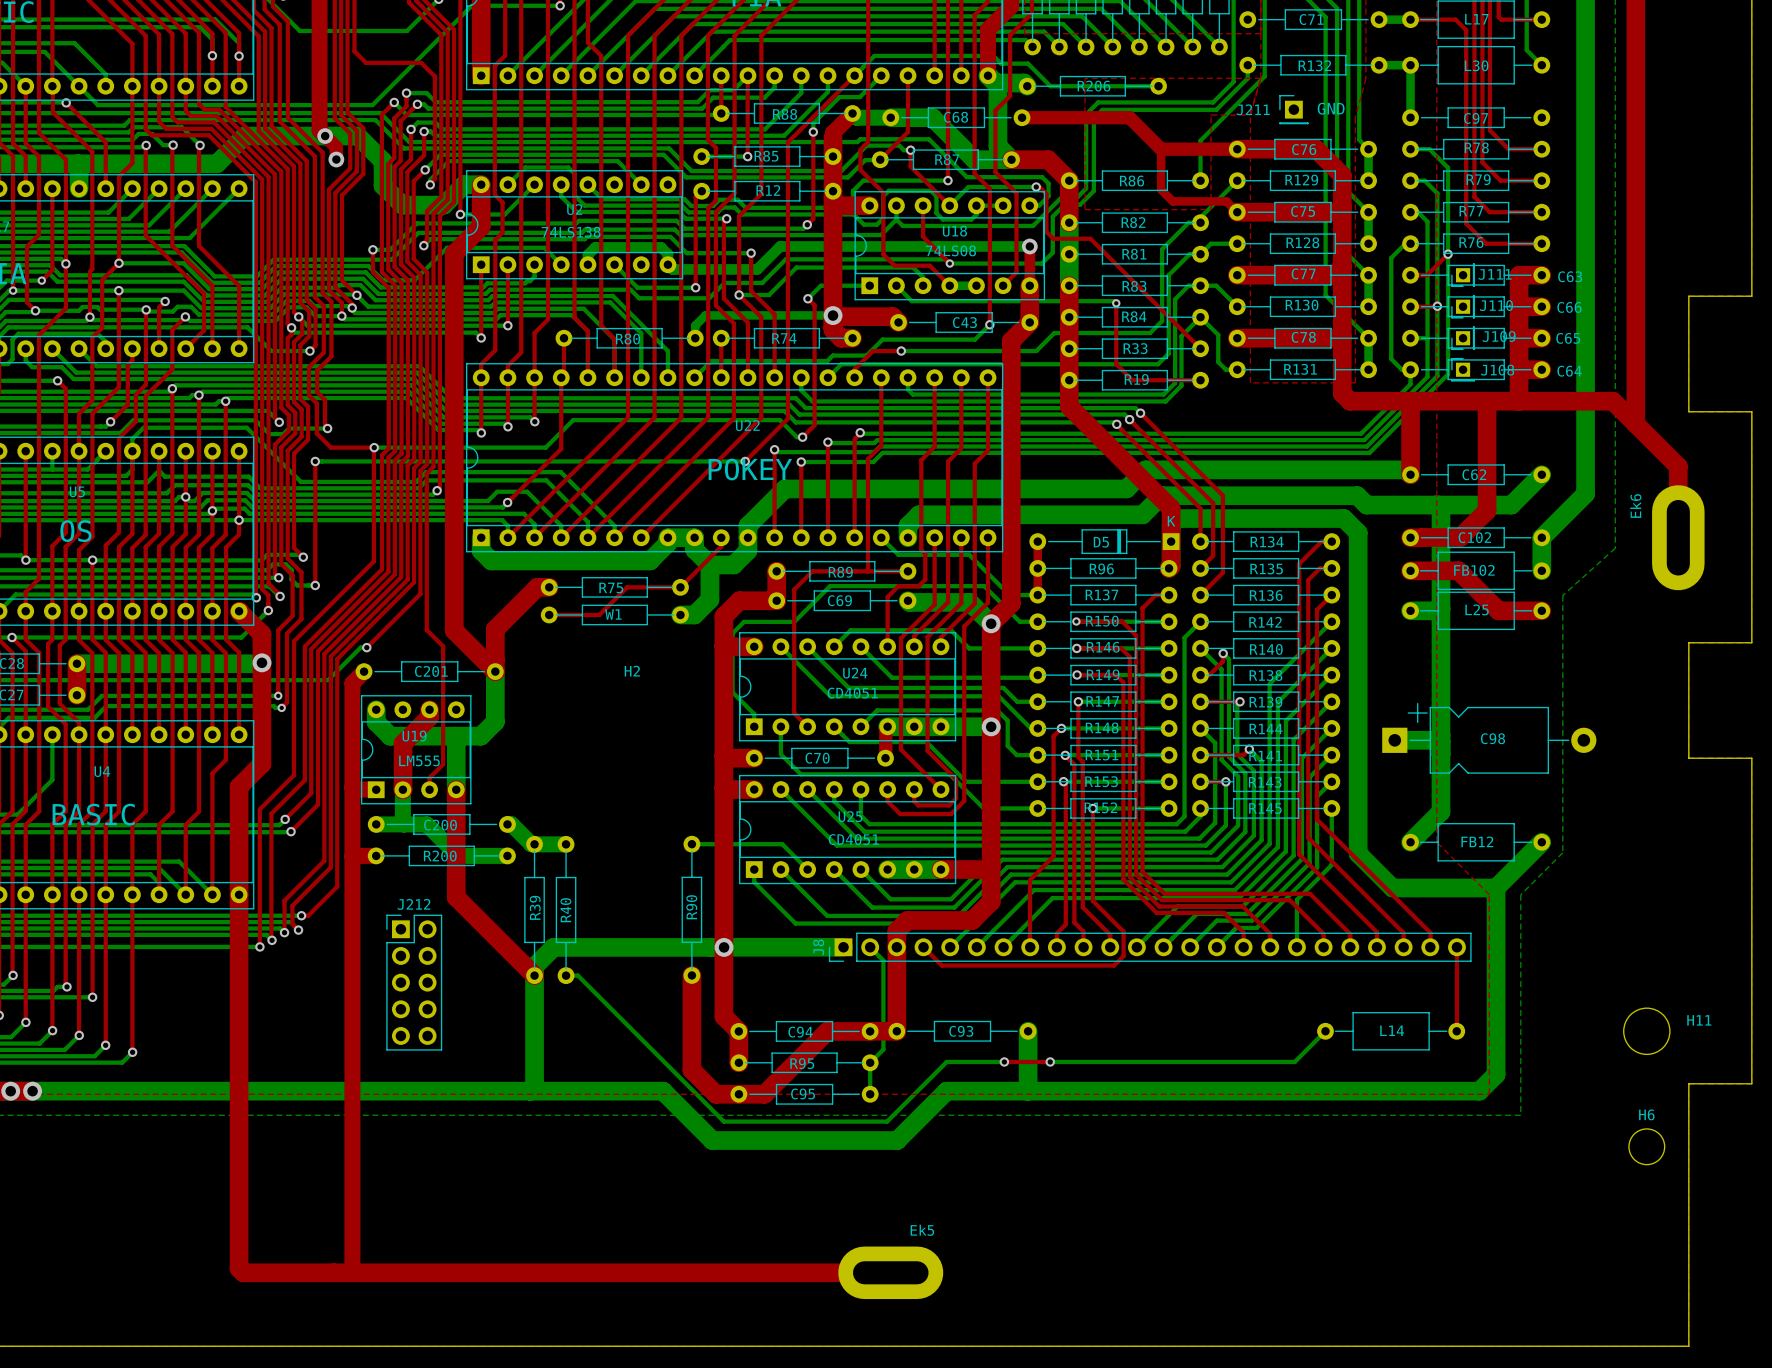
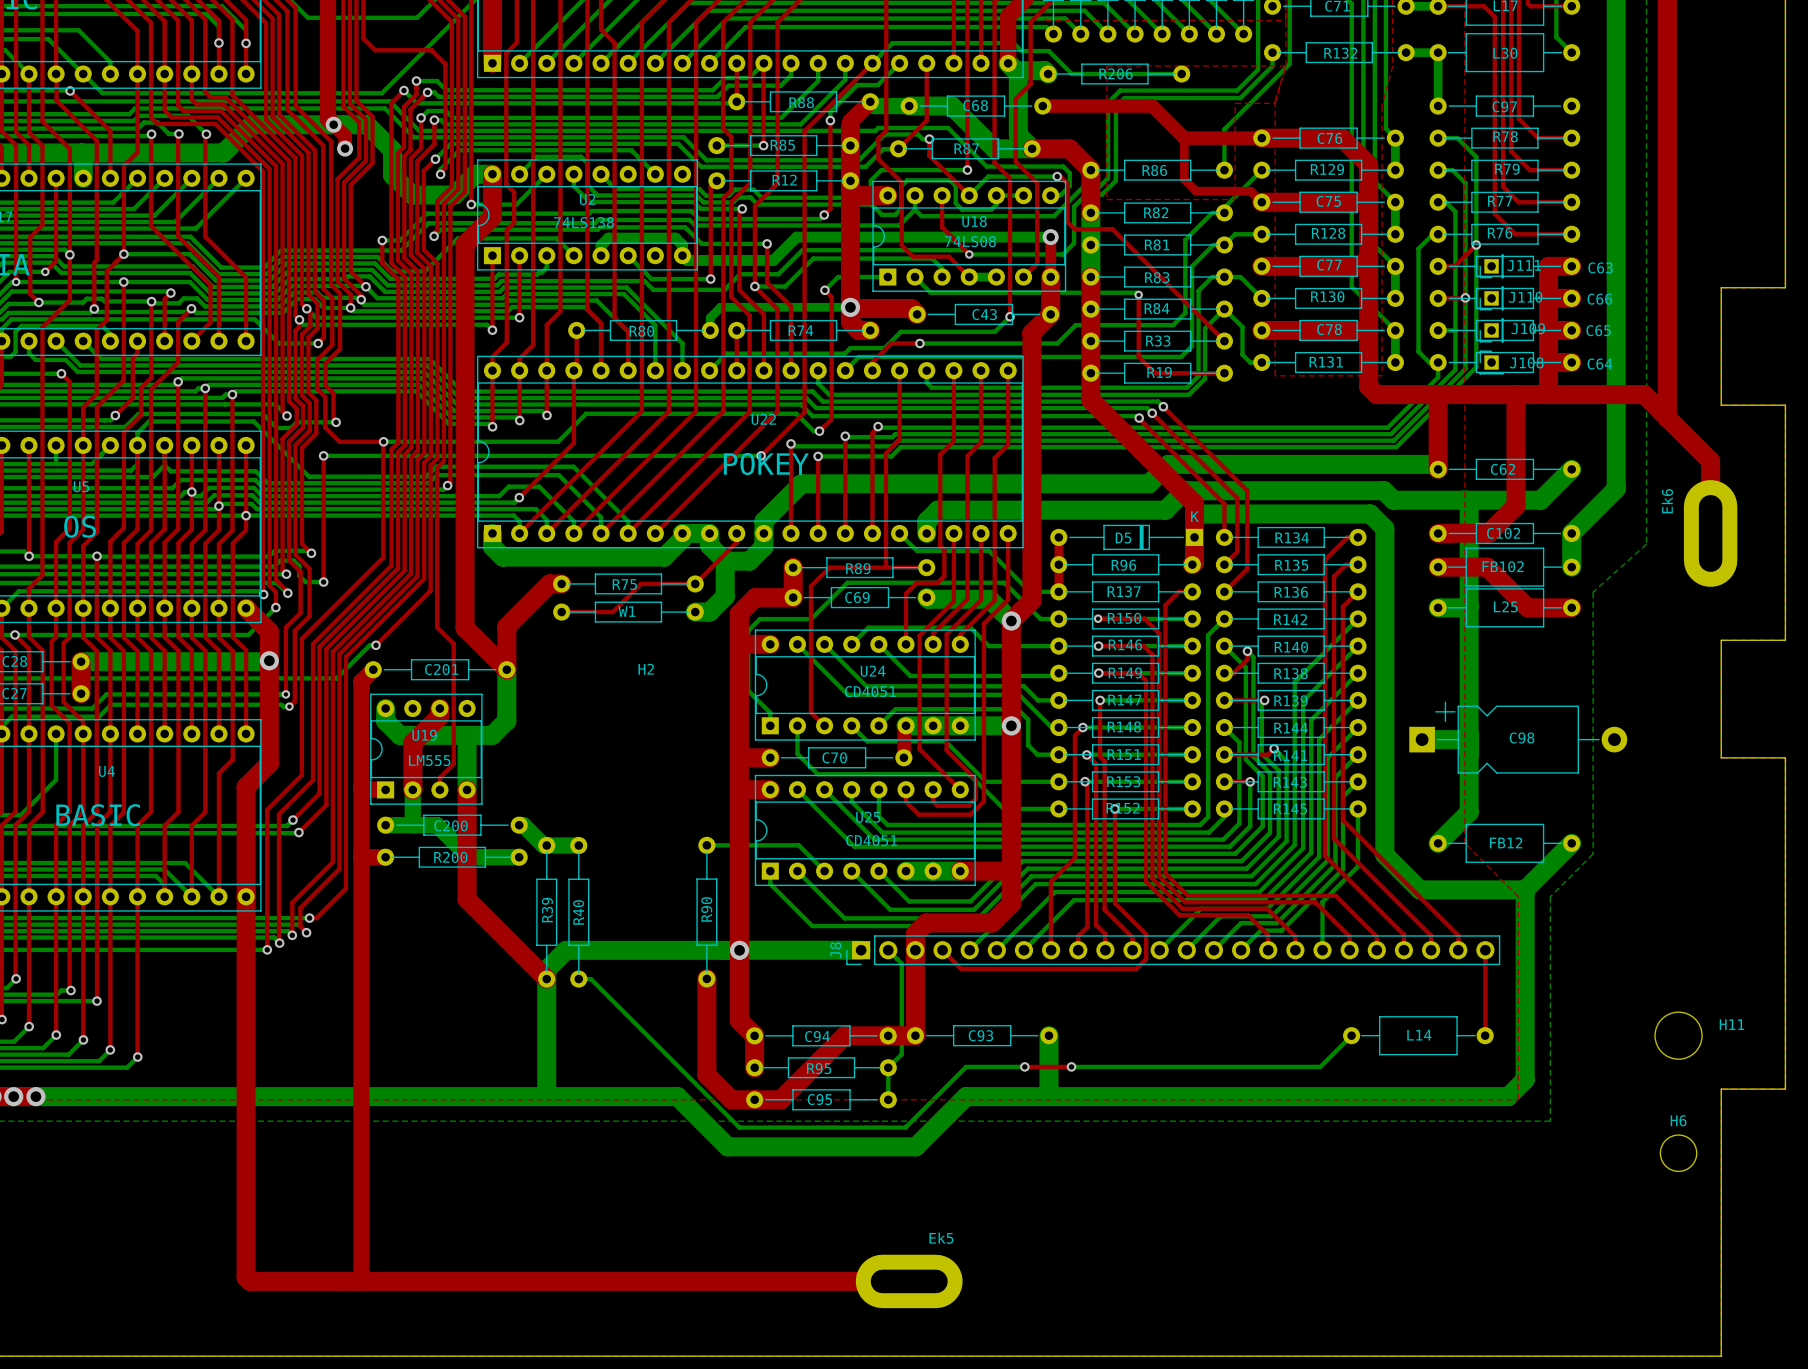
text: GND (1331, 108) -> none
J211: (1293, 109) -> none
J212: (414, 982) -> none

